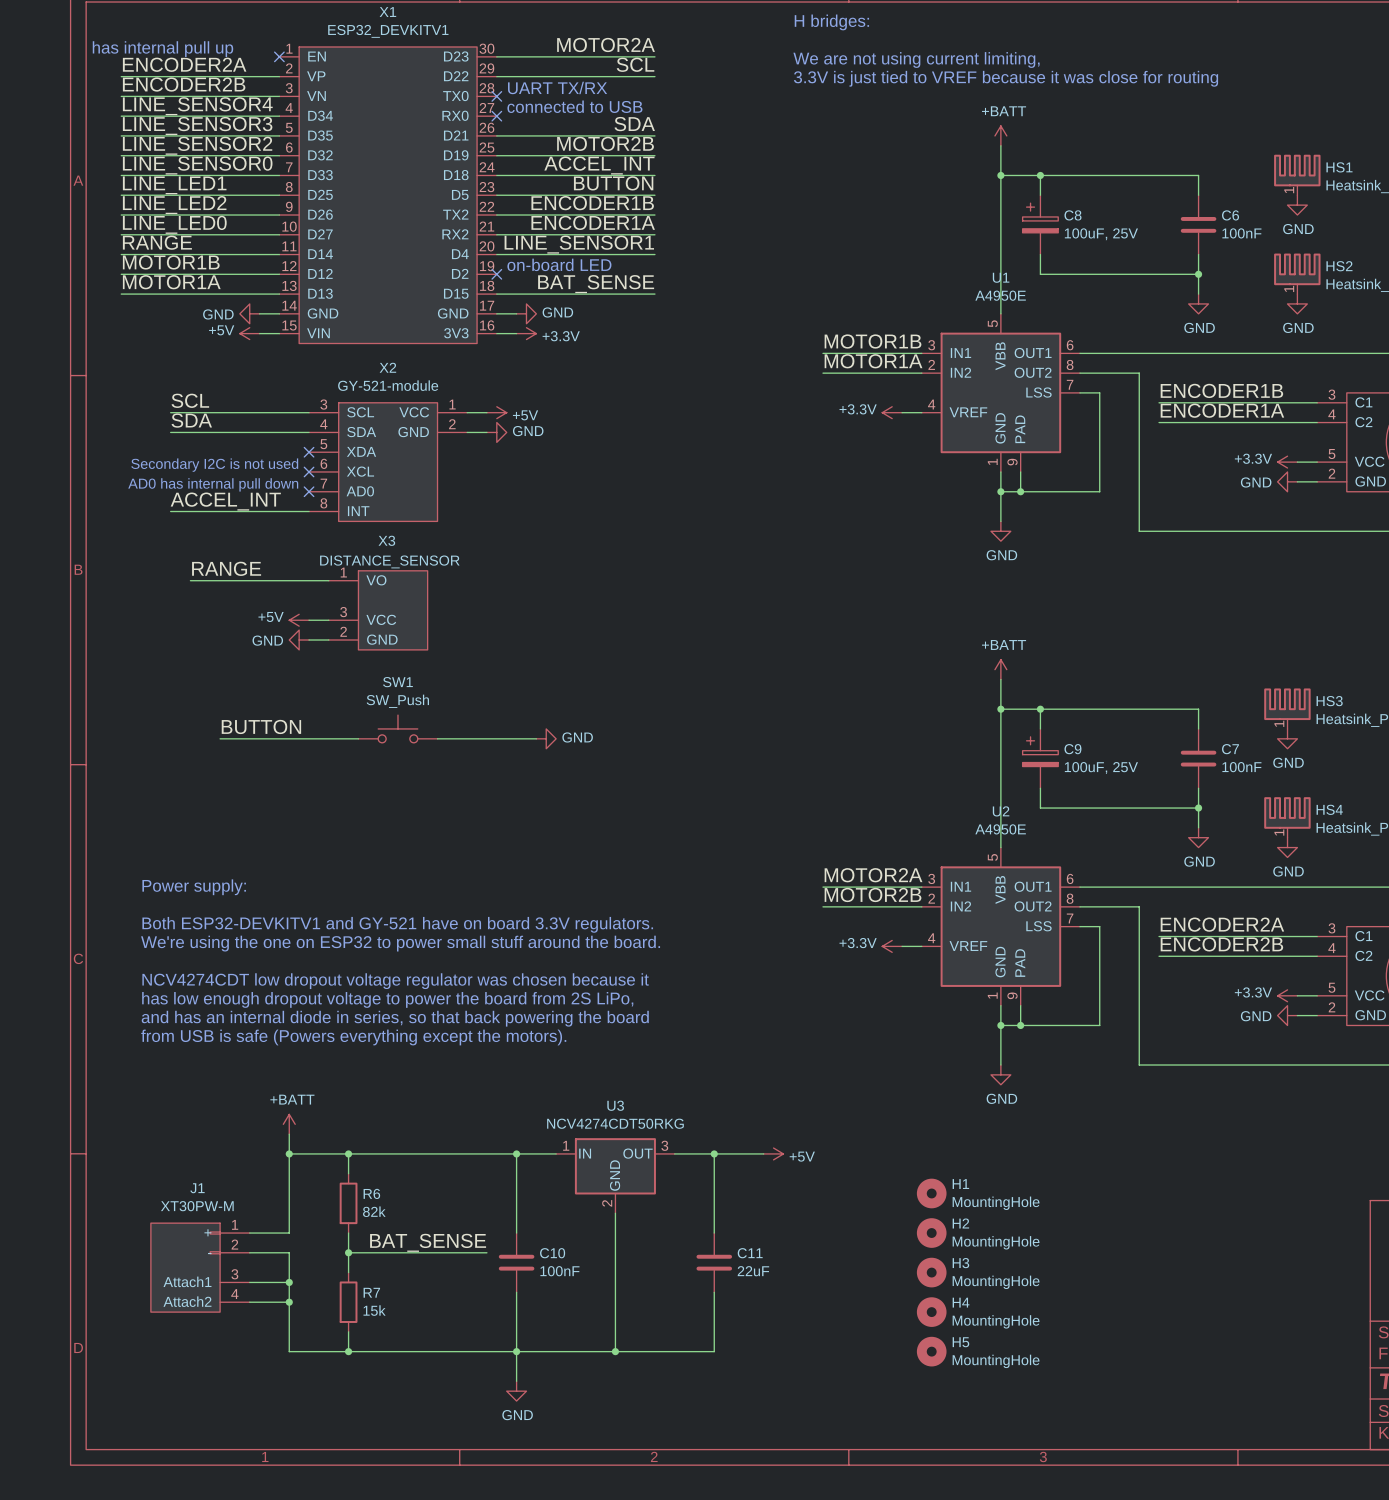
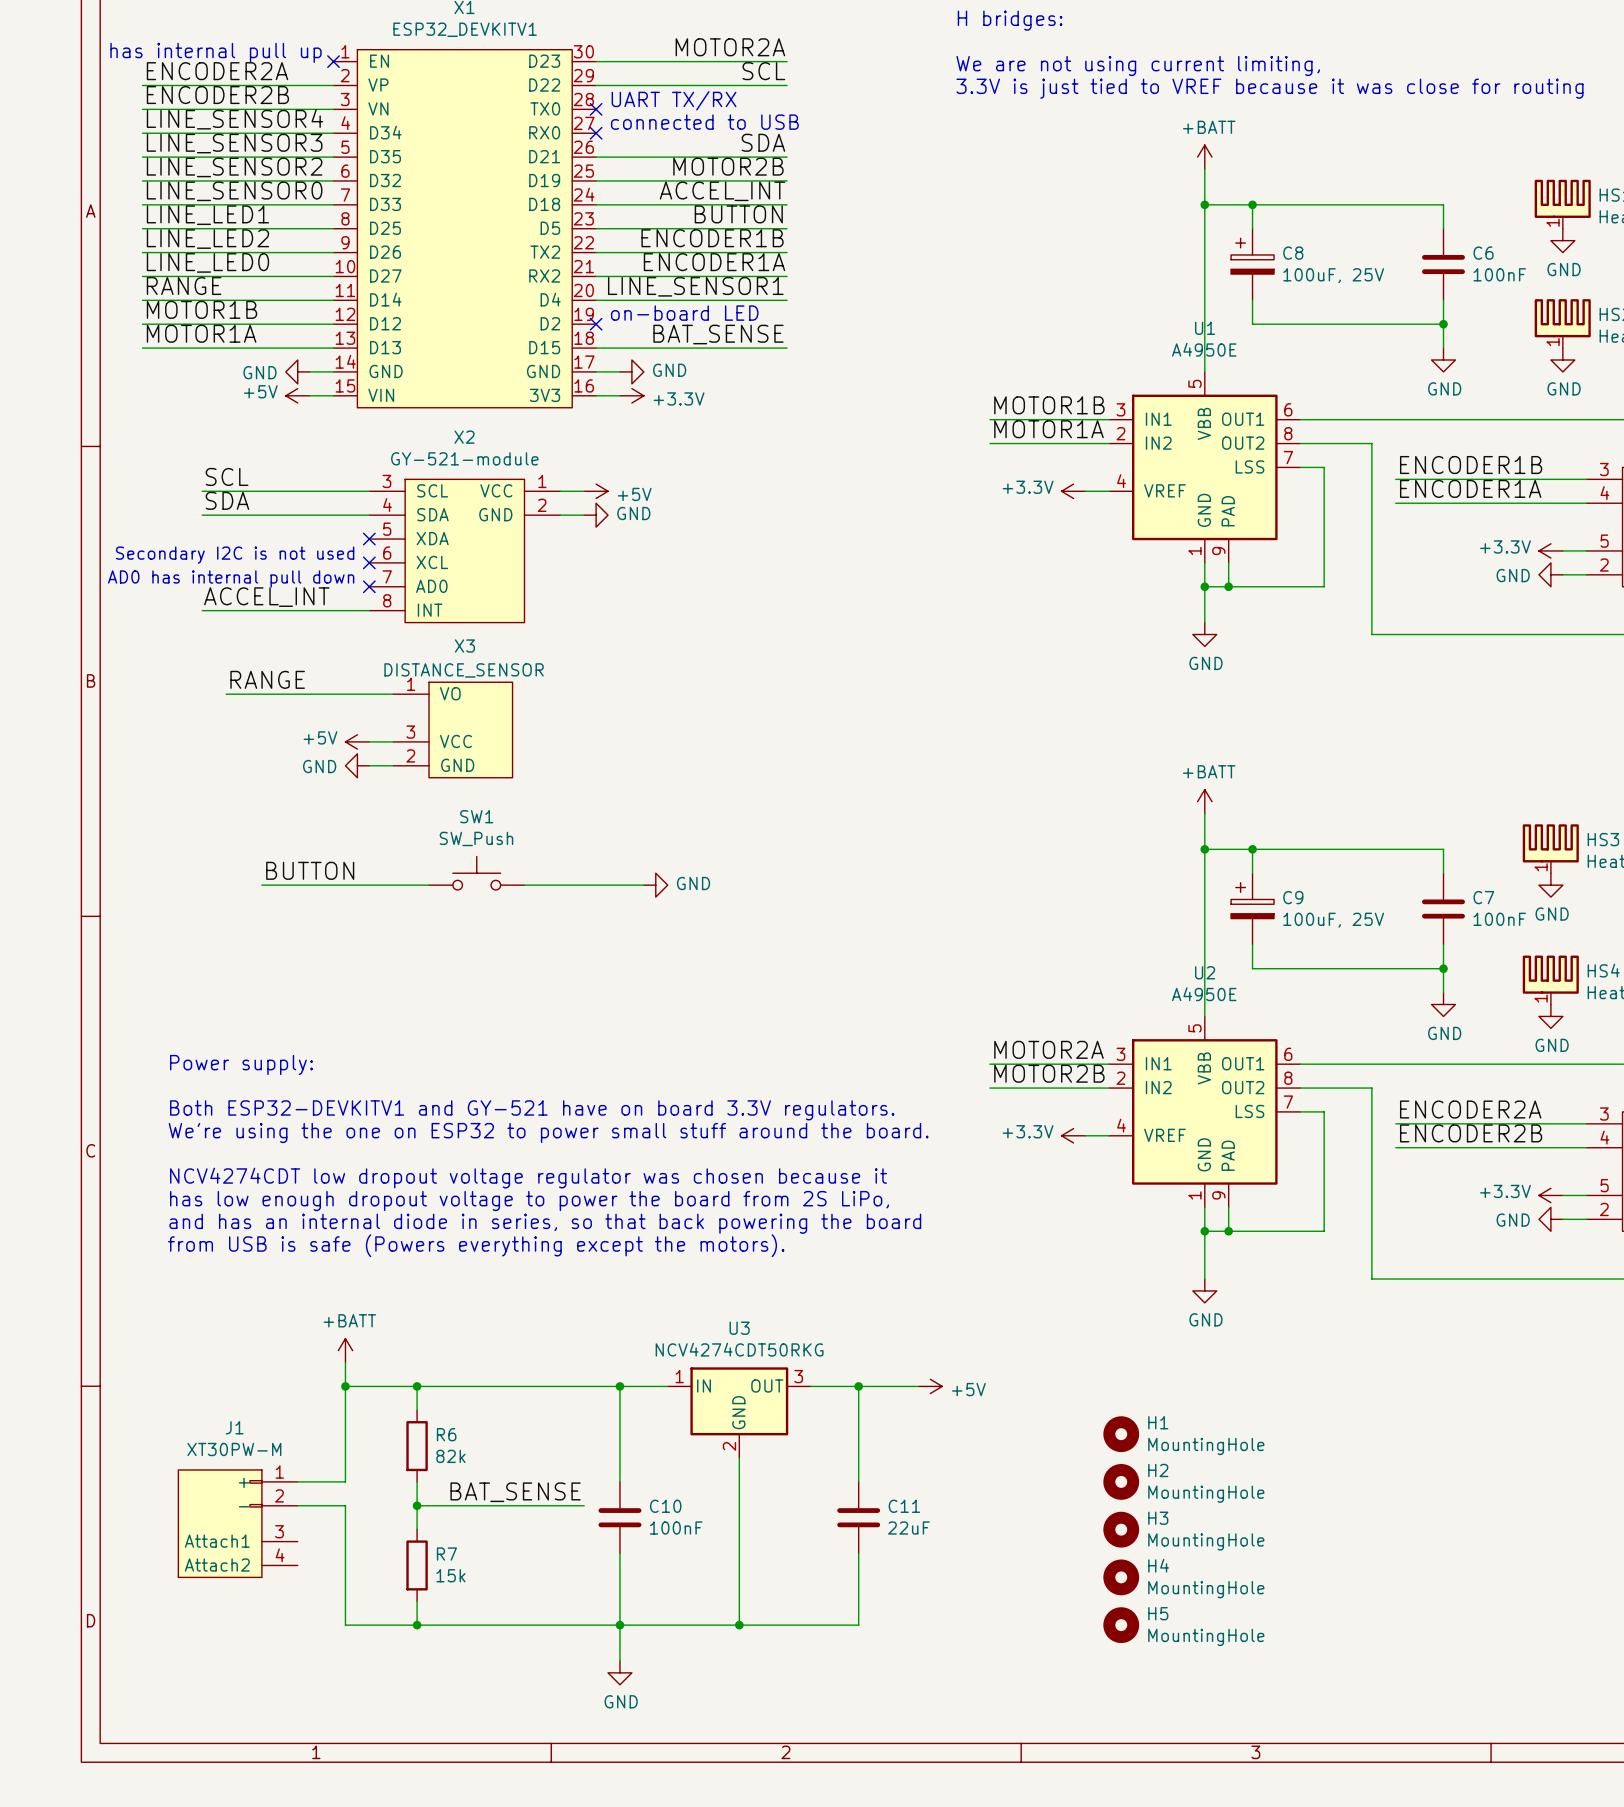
wire: (249, 1282) (289, 1282) -> none
junction: (289, 1282) -> none
wire: (249, 1302) (289, 1302) -> none
junction: (289, 1302) -> none

